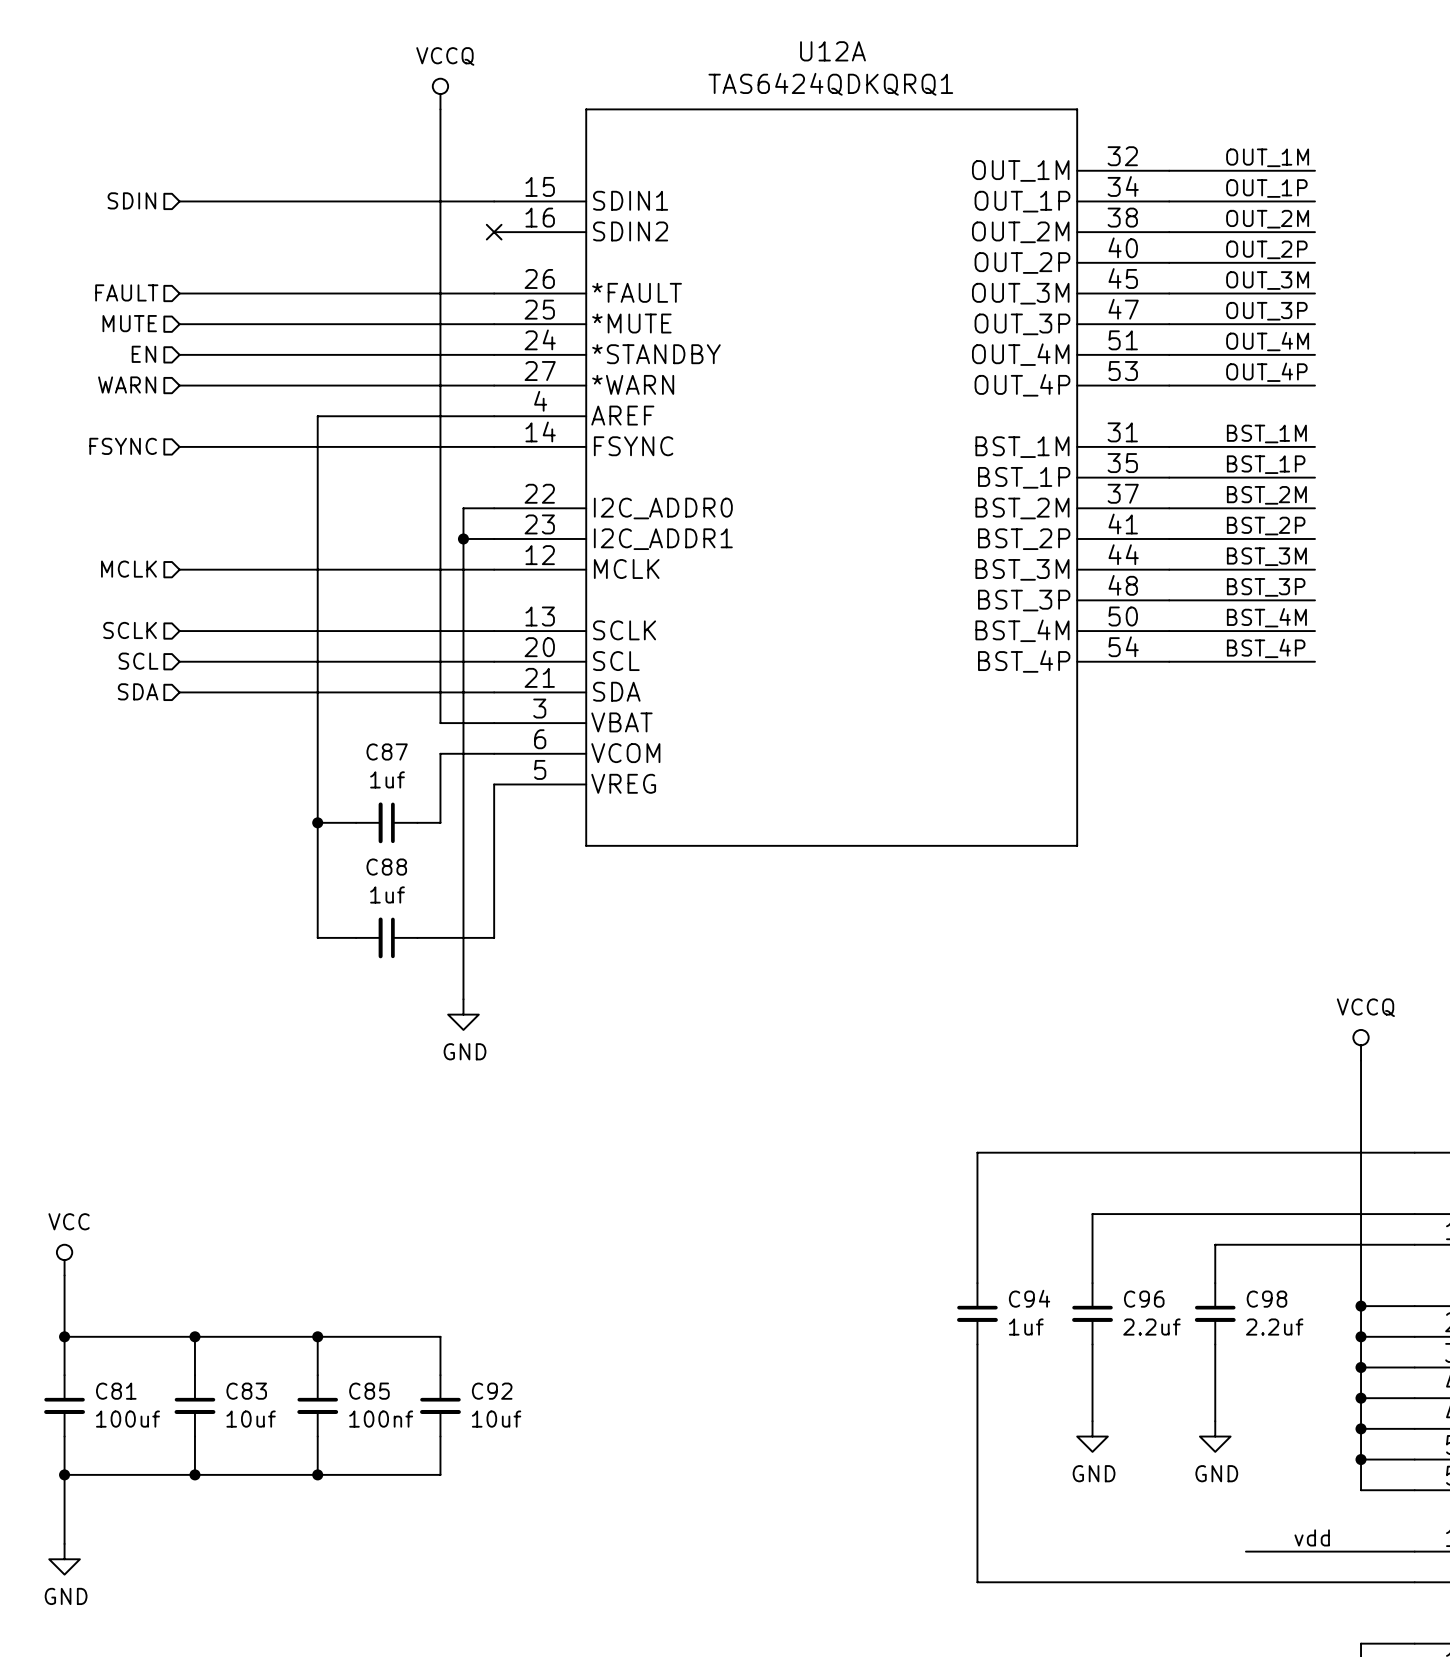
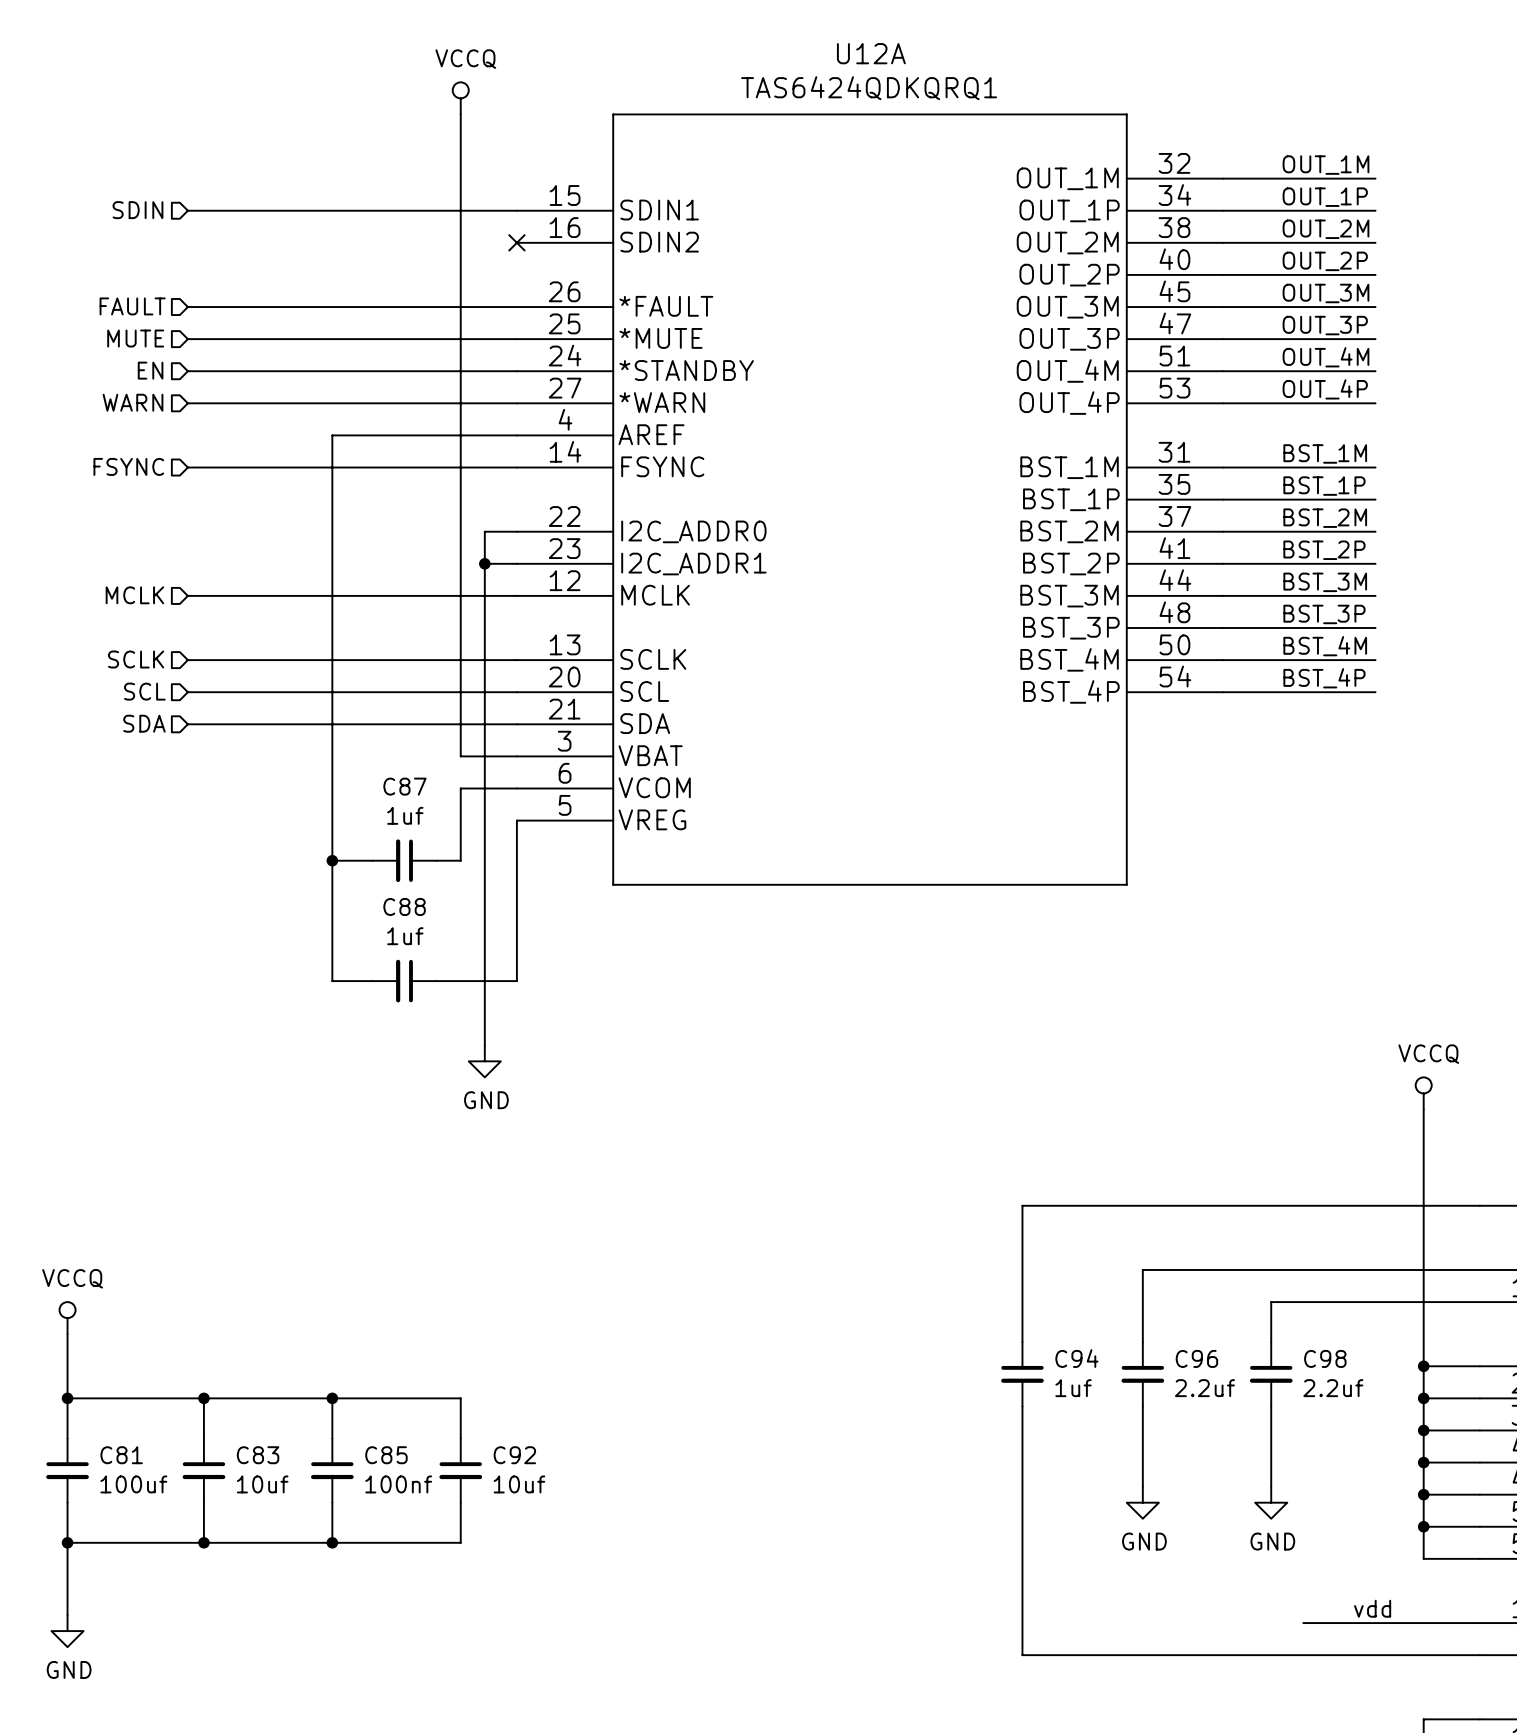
power symbol: VCC (64, 1260) -> VCCQ (67, 1318)

